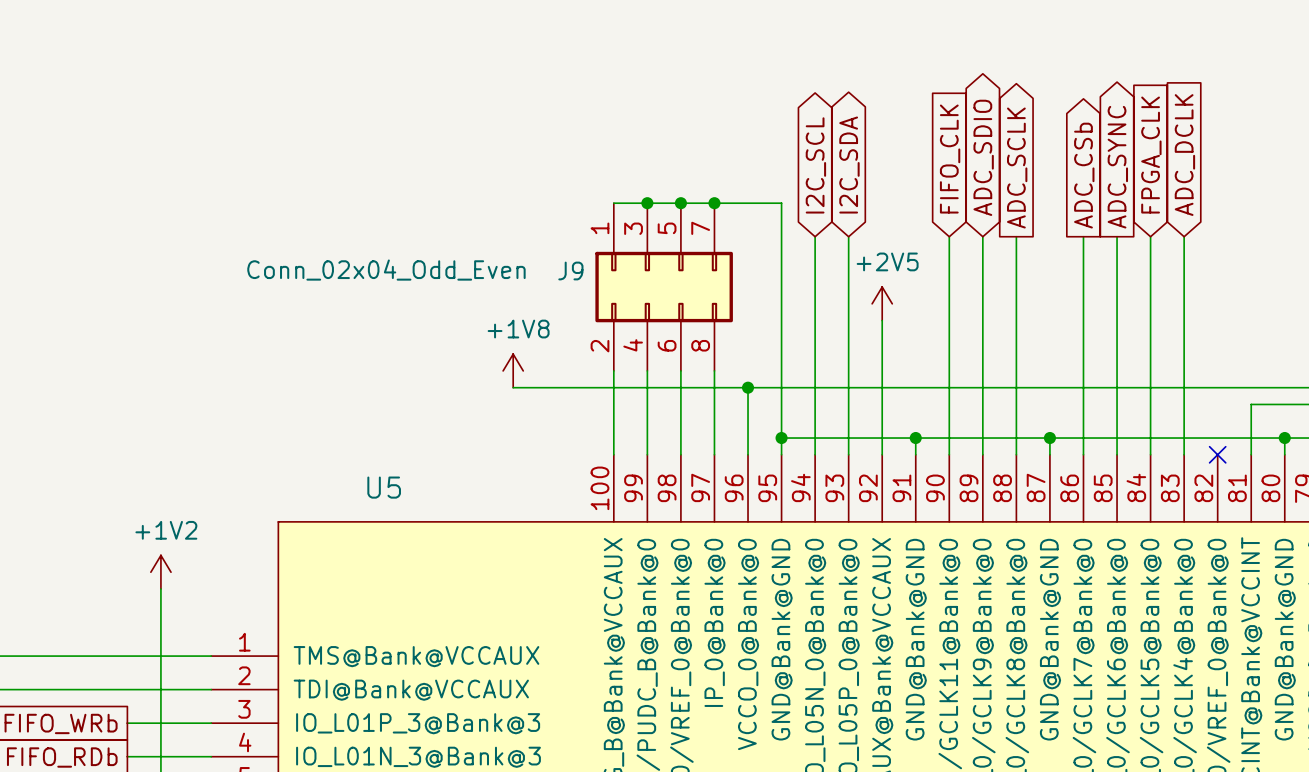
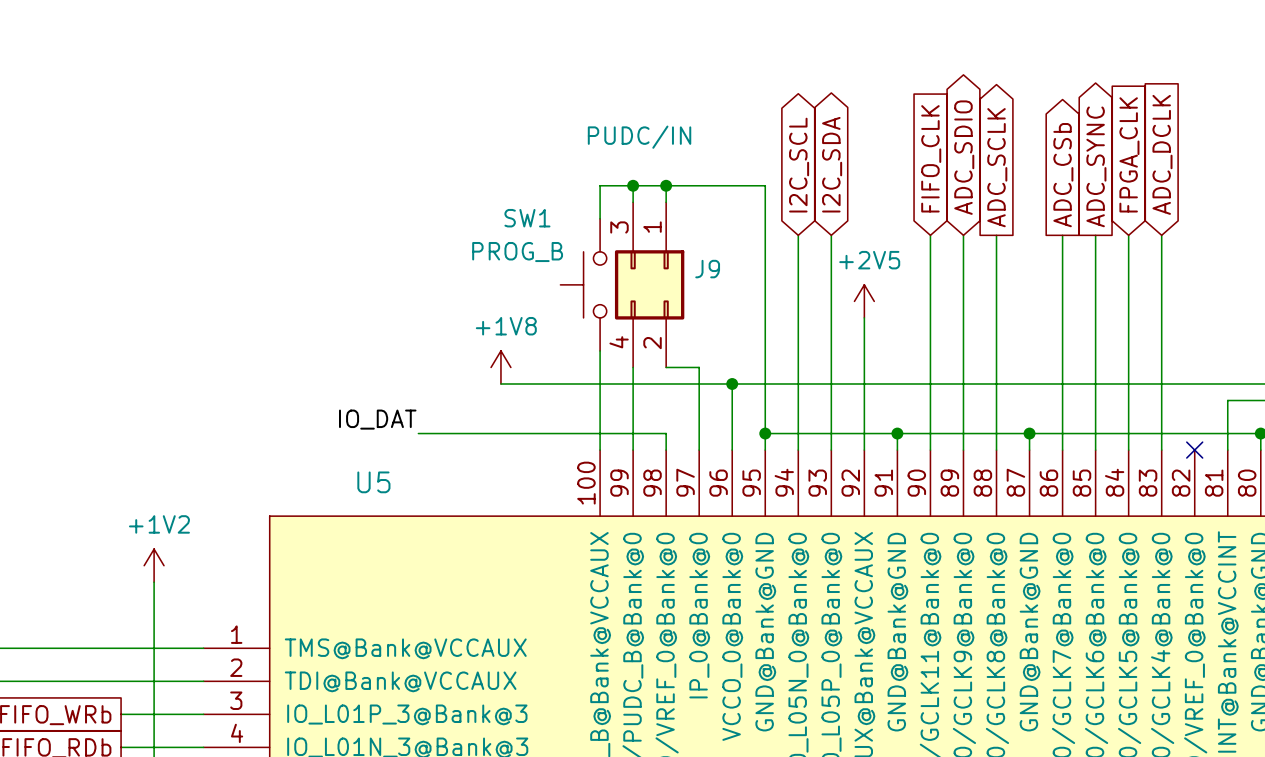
wire: none -> (633, 185) (633, 202)
wire: none -> (666, 185) (666, 202)
J9 symbol: [595, 203, 733, 371] -> [614, 202, 685, 368]
wire: (613, 203) (781, 203) -> (600, 218) (600, 185) (765, 185) (765, 202)
junction position: (647, 203) -> (633, 185)
junction position: (680, 203) -> (666, 185)
junction: (714, 203) -> none
J9 value: Conn_02x04_Odd_Even (386, 270) -> PUDC/IN (639, 137)
J9 name position: J9 (570, 270) -> J9 (707, 269)
SW1: none -> PROG_B (583, 284)
wire: (680, 370) (680, 438) -> (666, 367) (699, 367)
label: none -> IO_DAT (377, 419)
wire: none -> (418, 433) (666, 433)

